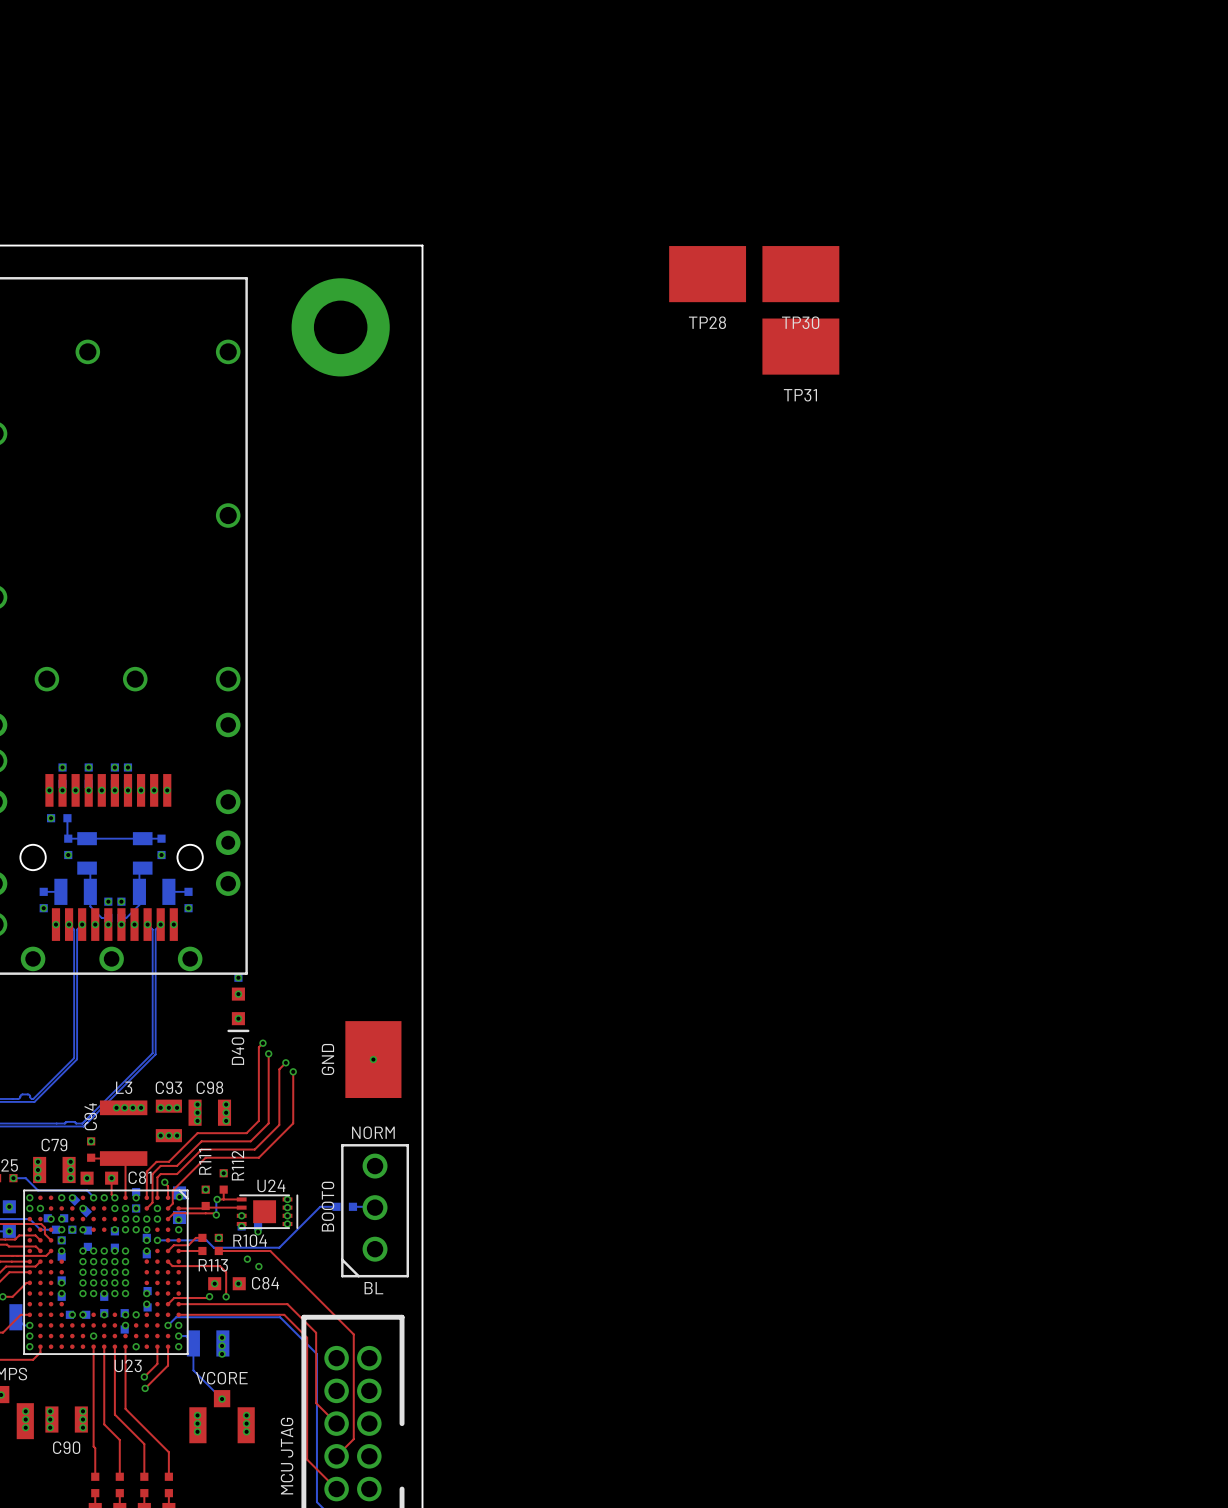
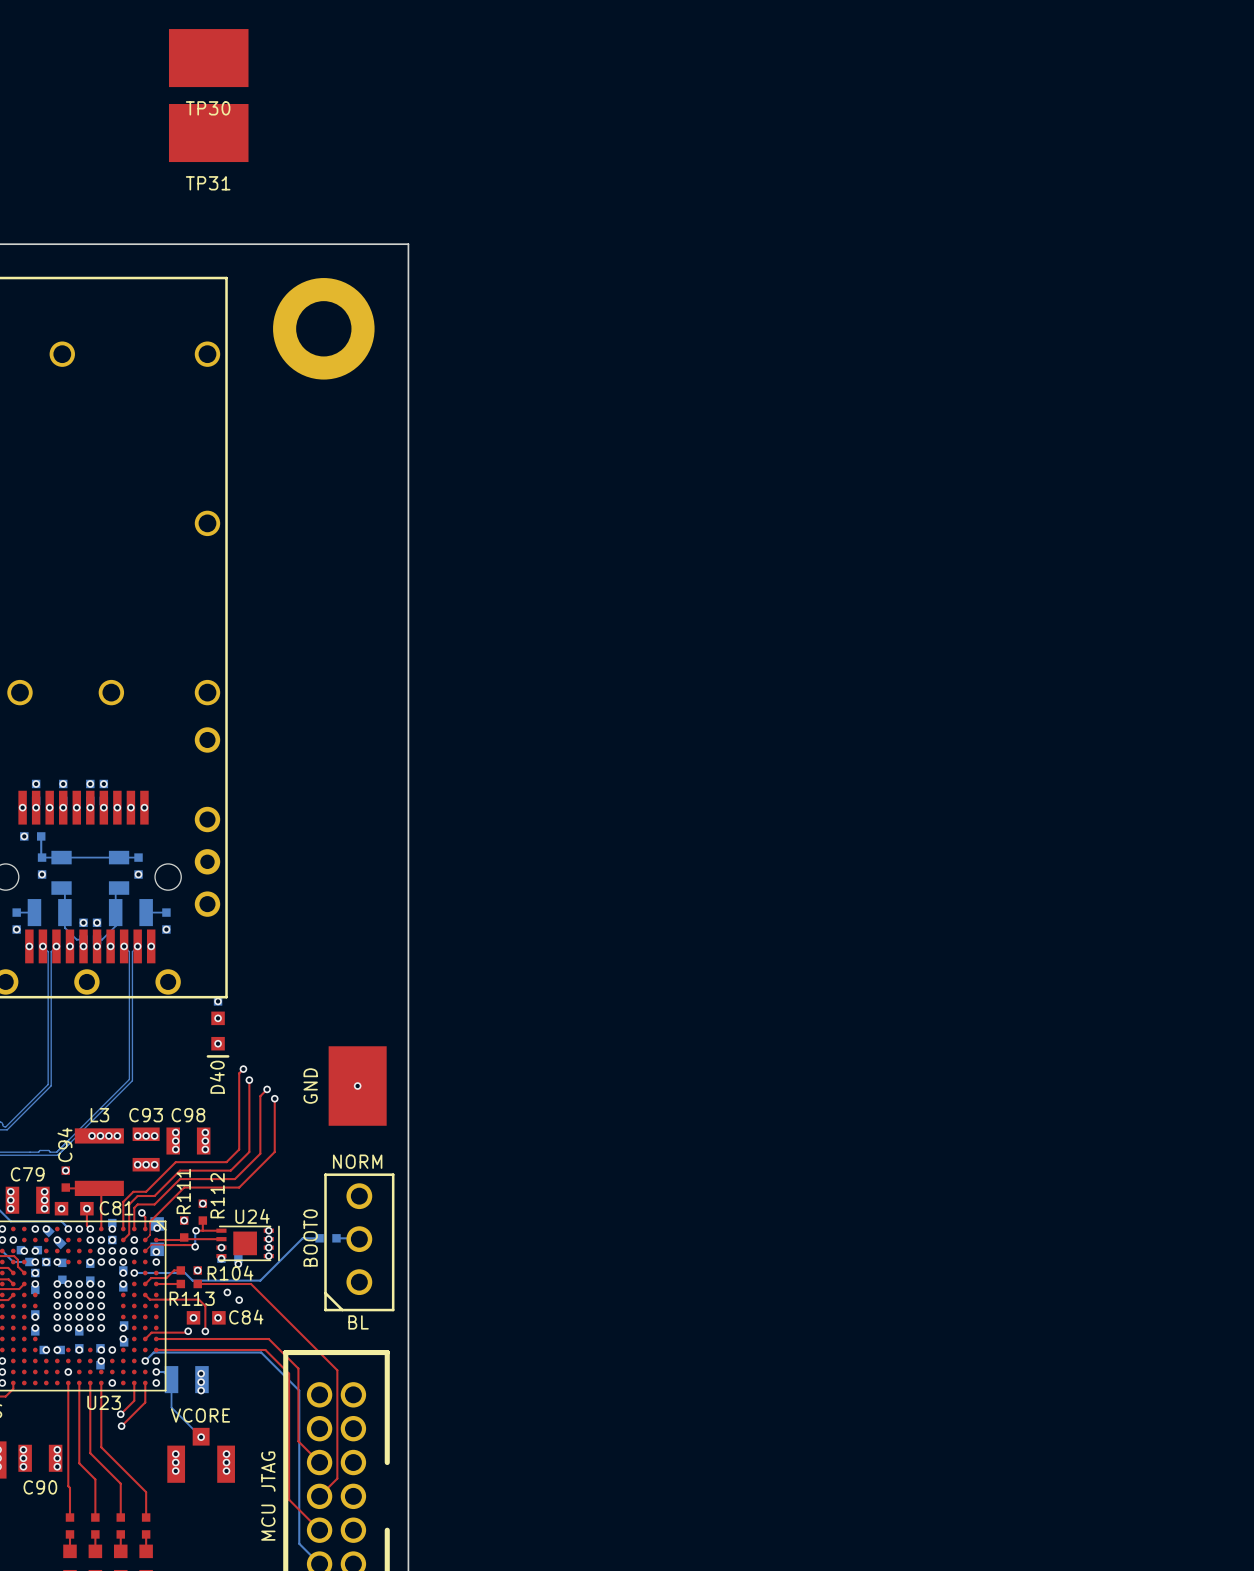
TP28: (707, 274) -> none
TP30 position: (800, 274) -> (208, 58)
TP31 position: (800, 346) -> (208, 133)

